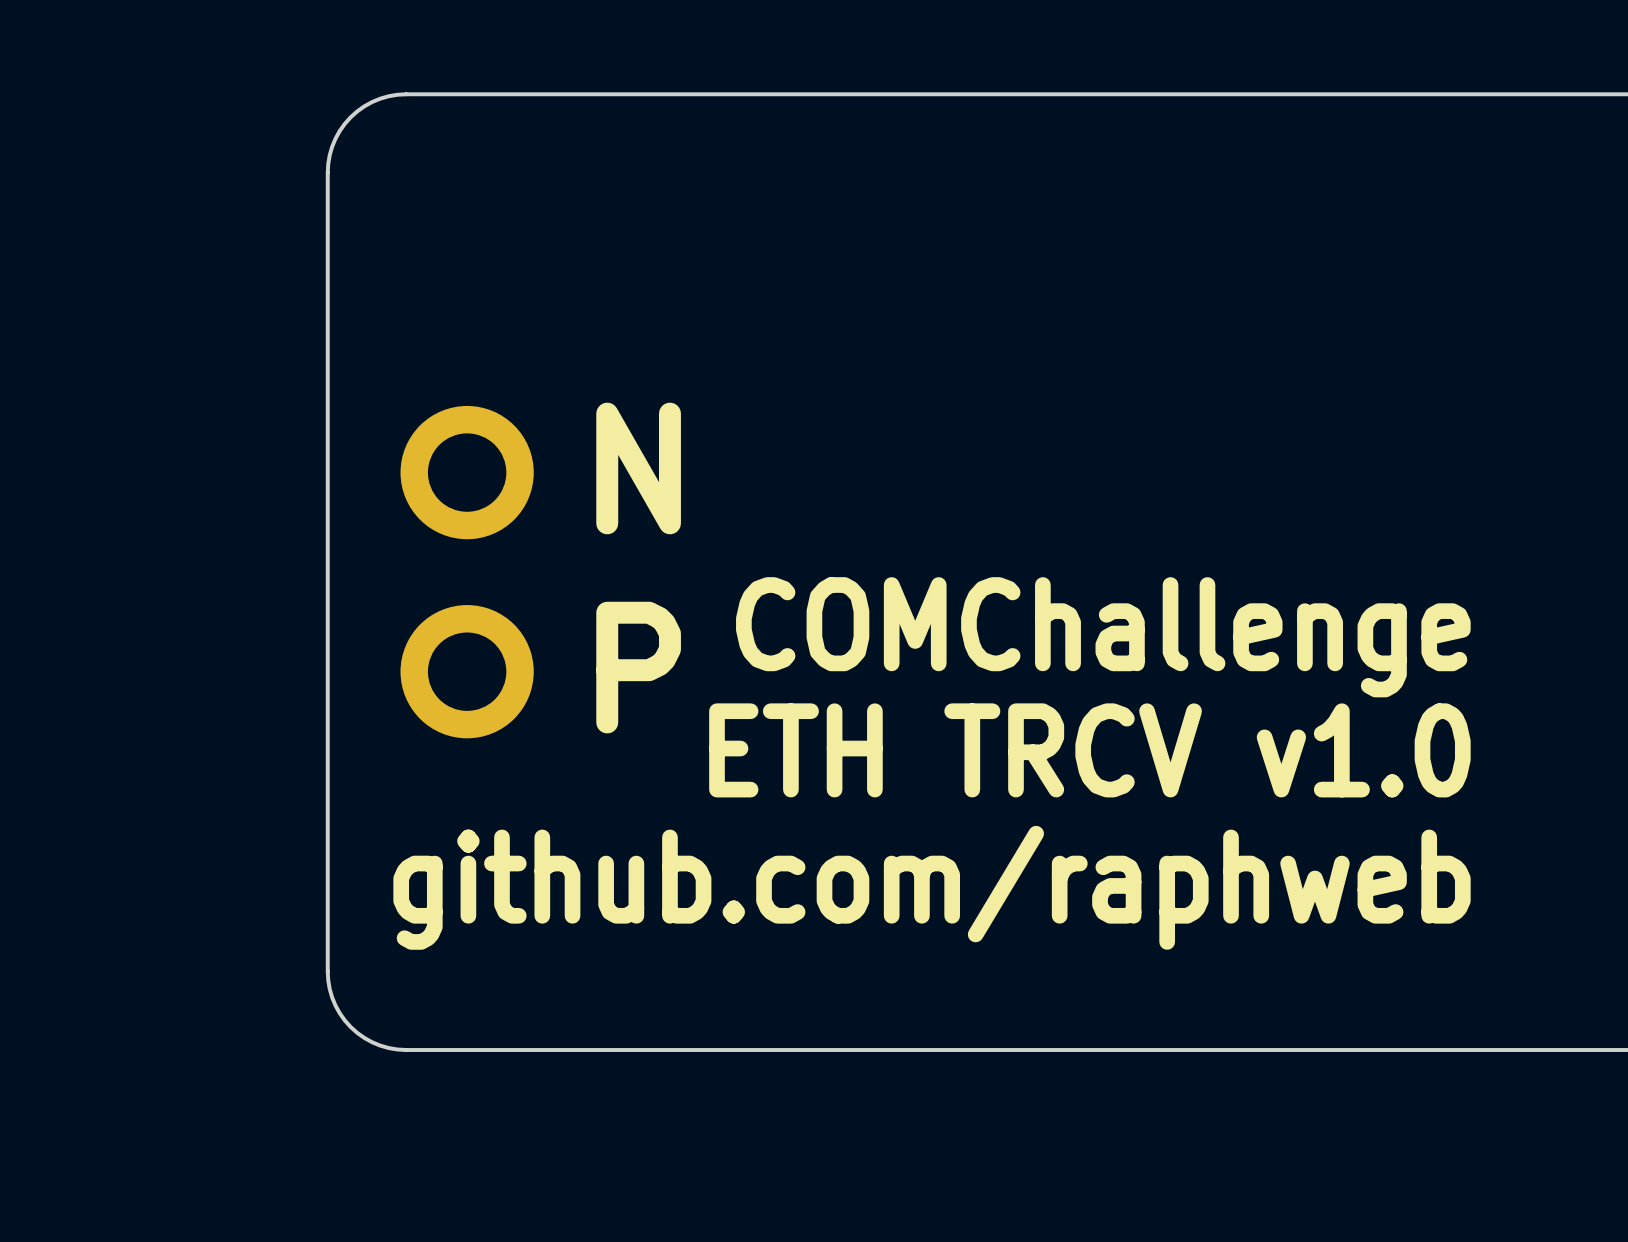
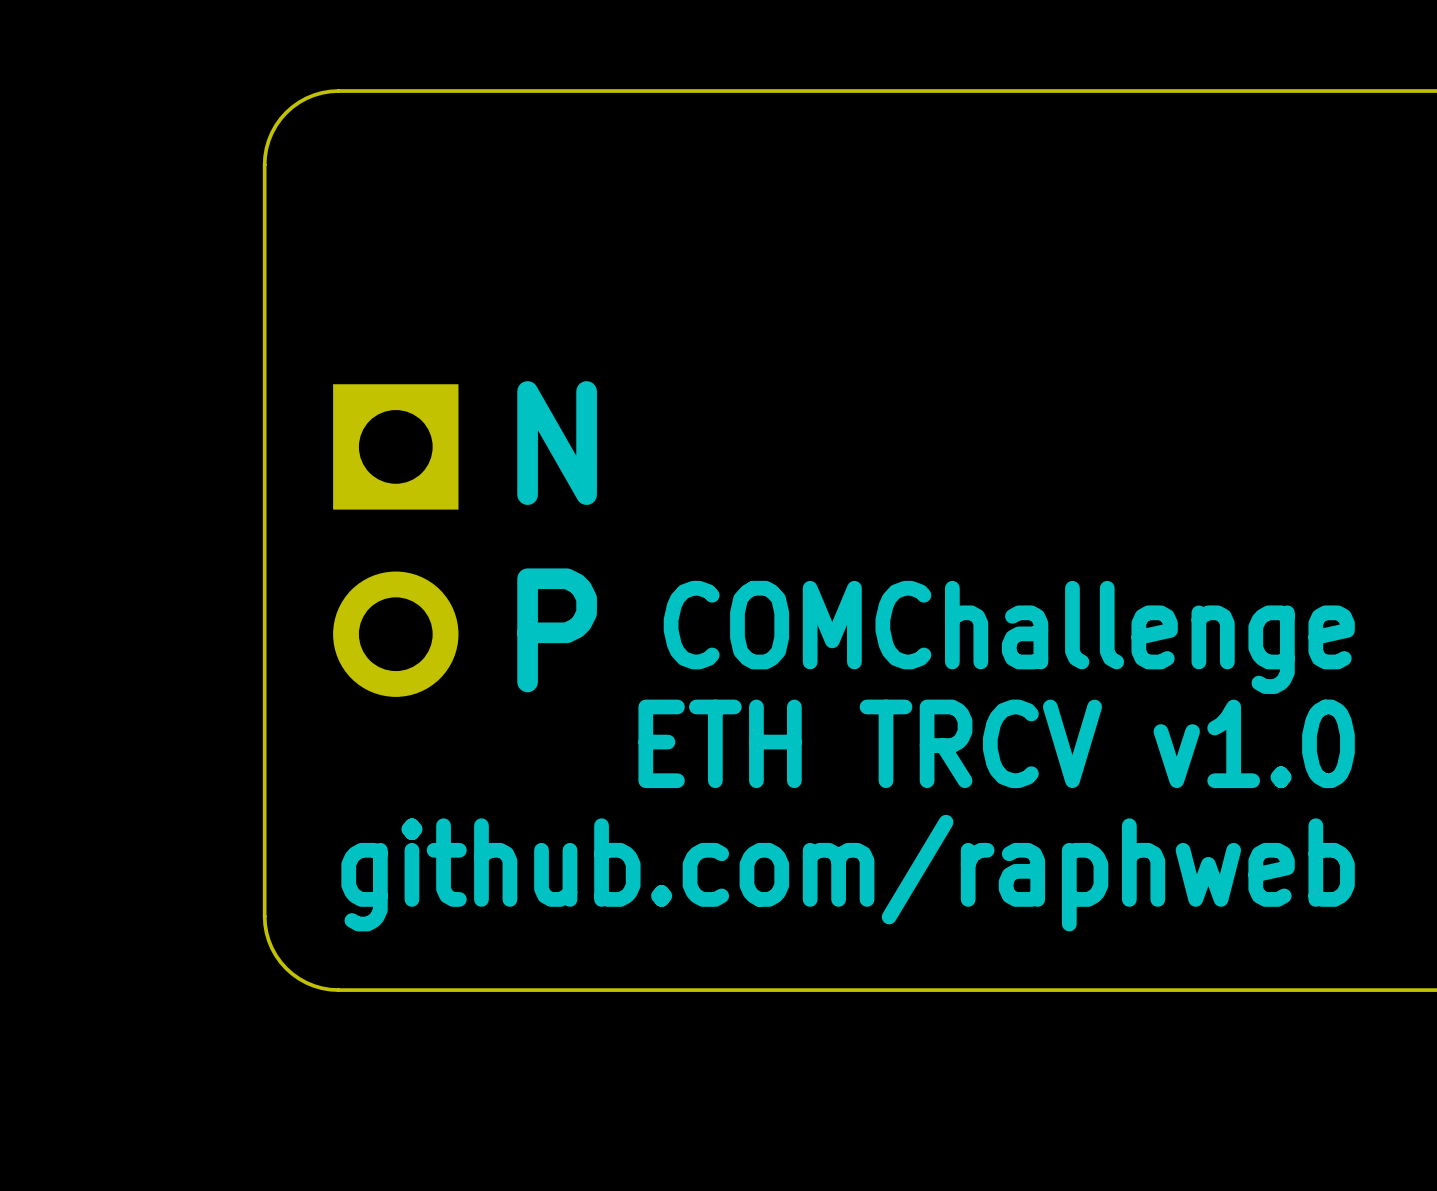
part footprint: [400, 405, 534, 739] -> [333, 384, 459, 697]
text position: COMChallenge (1103, 637) -> COMChallenge (1009, 637)
text position: ETH TRCV v1.0 (1089, 750) -> ETH TRCV v1.0 (996, 743)
text position: github.com/raphweb (932, 887) -> github.com/raphweb (848, 873)

